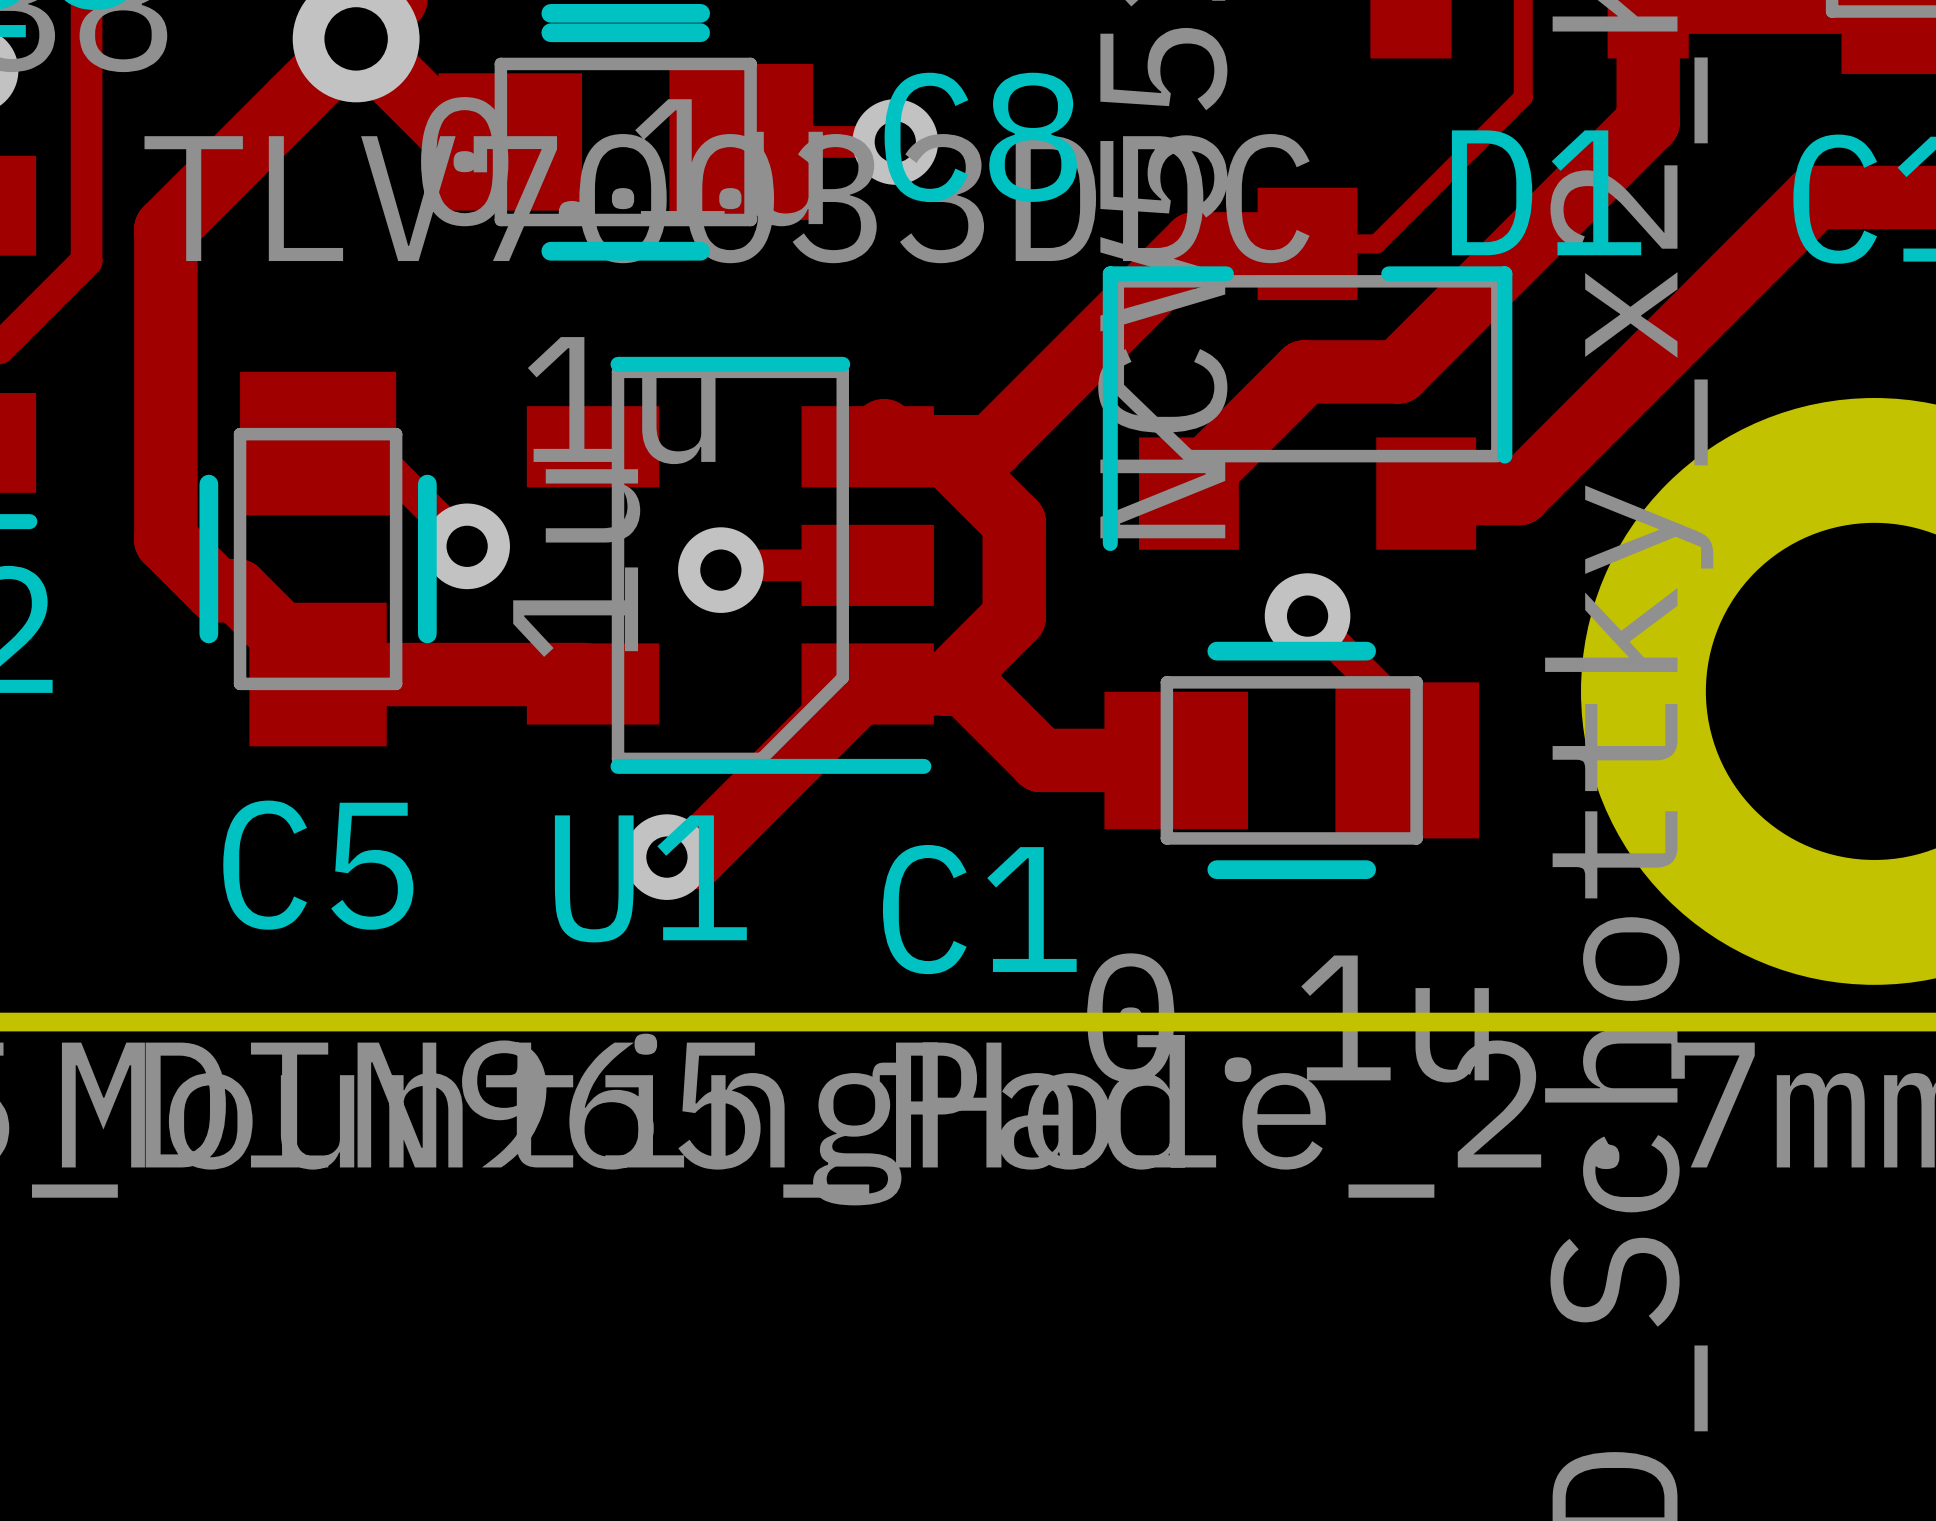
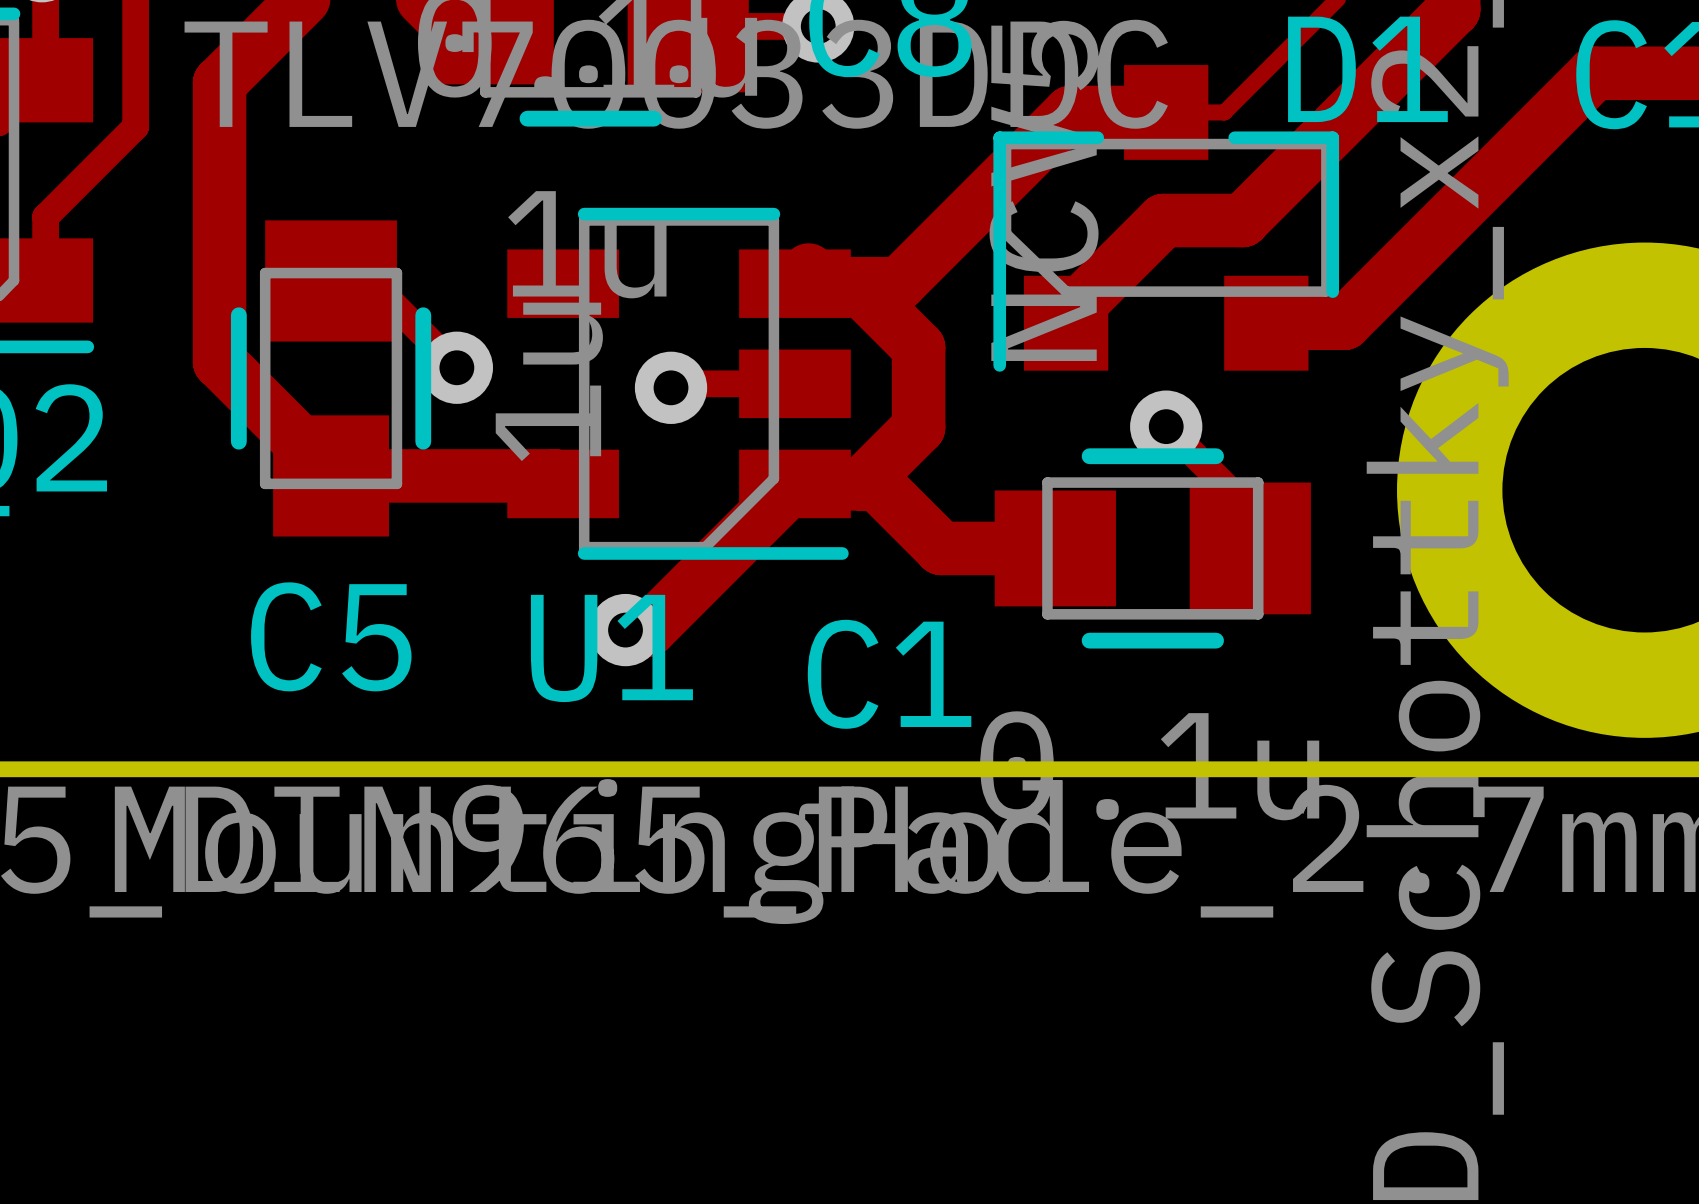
track: (185, 209) (165, 229) (165, 539) (216, 590) (237, 590) -> (219, 83) (219, 361) (262, 405)

